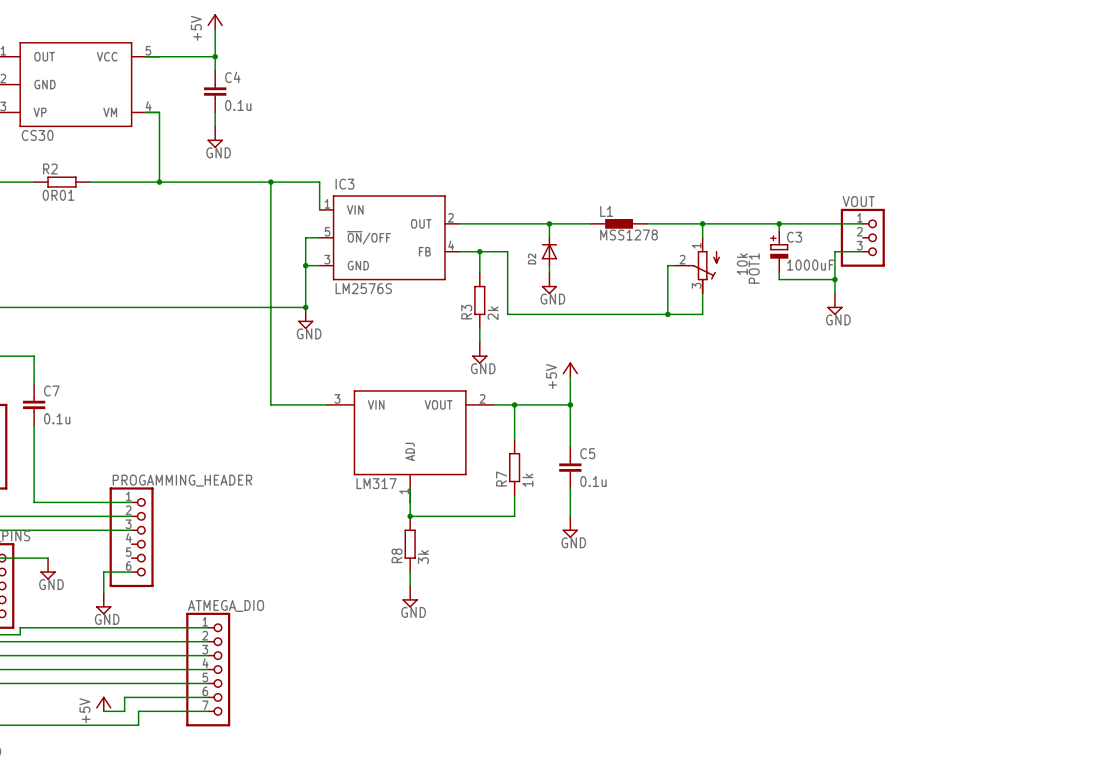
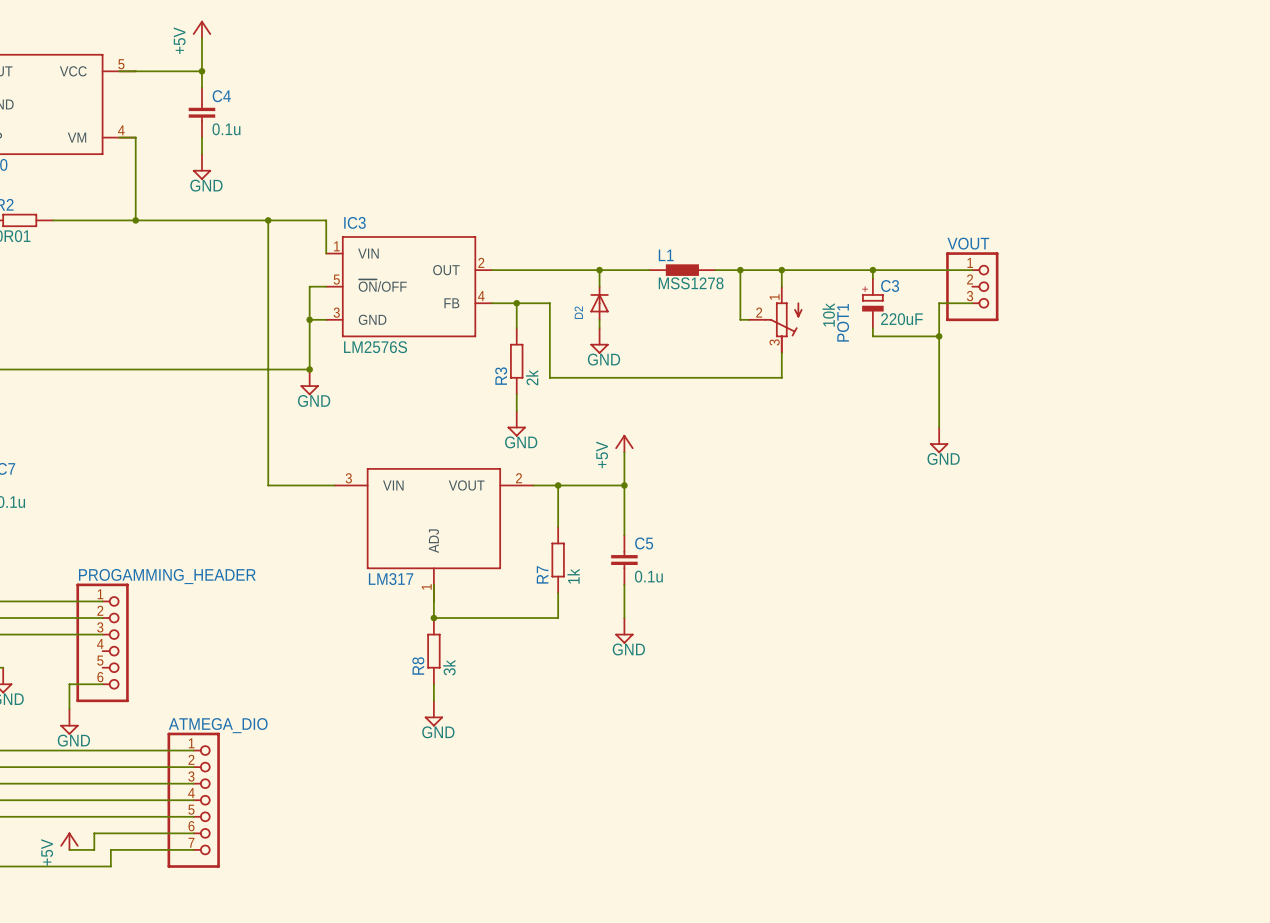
junction: none -> (740, 270)
wire: (667, 265) (667, 314) -> (740, 319) (740, 270)
C3 value: 1000uF (810, 265) -> 220uF (901, 319)
wire: none -> (939, 352) (939, 427)
power symbol position: GND (834, 304) -> GND (939, 440)
junction: (667, 314) -> none

